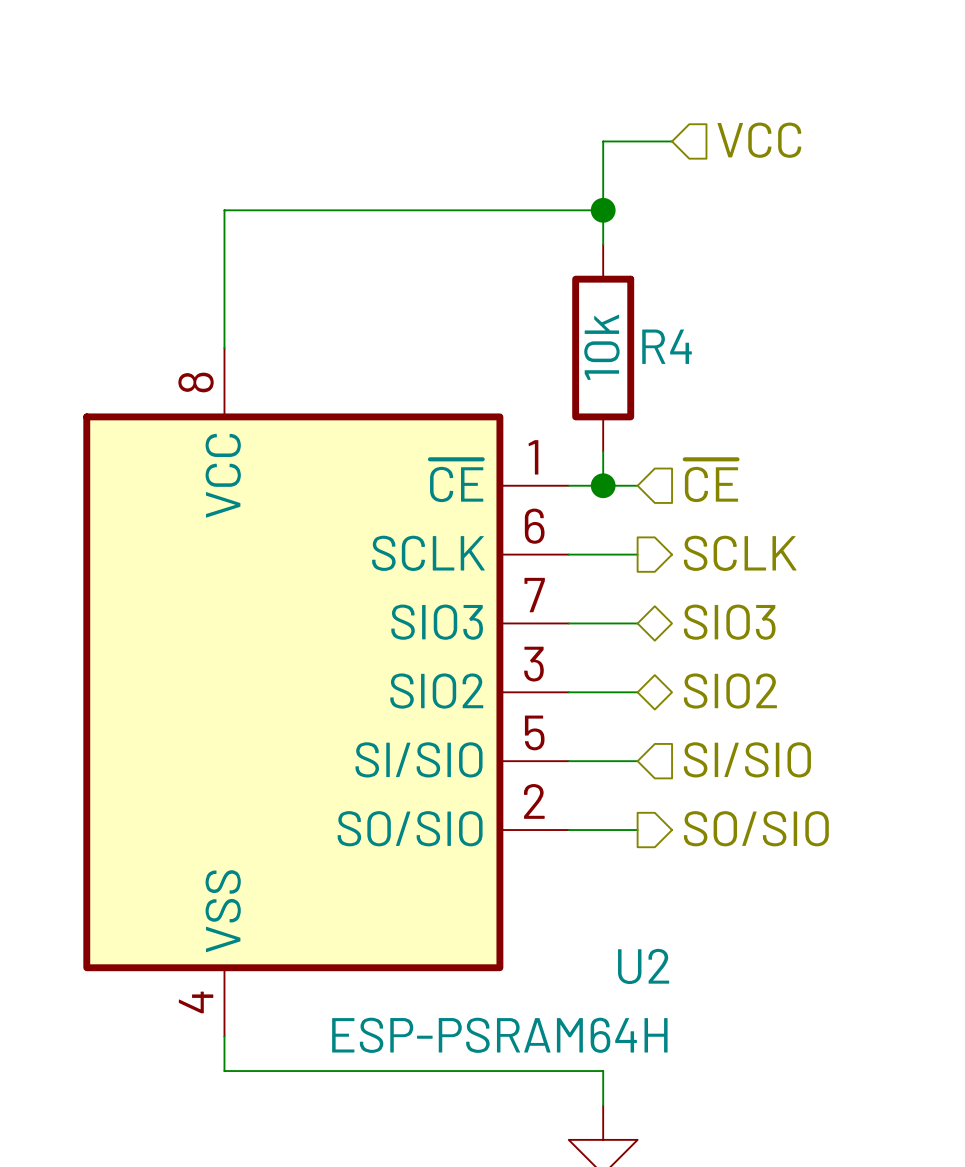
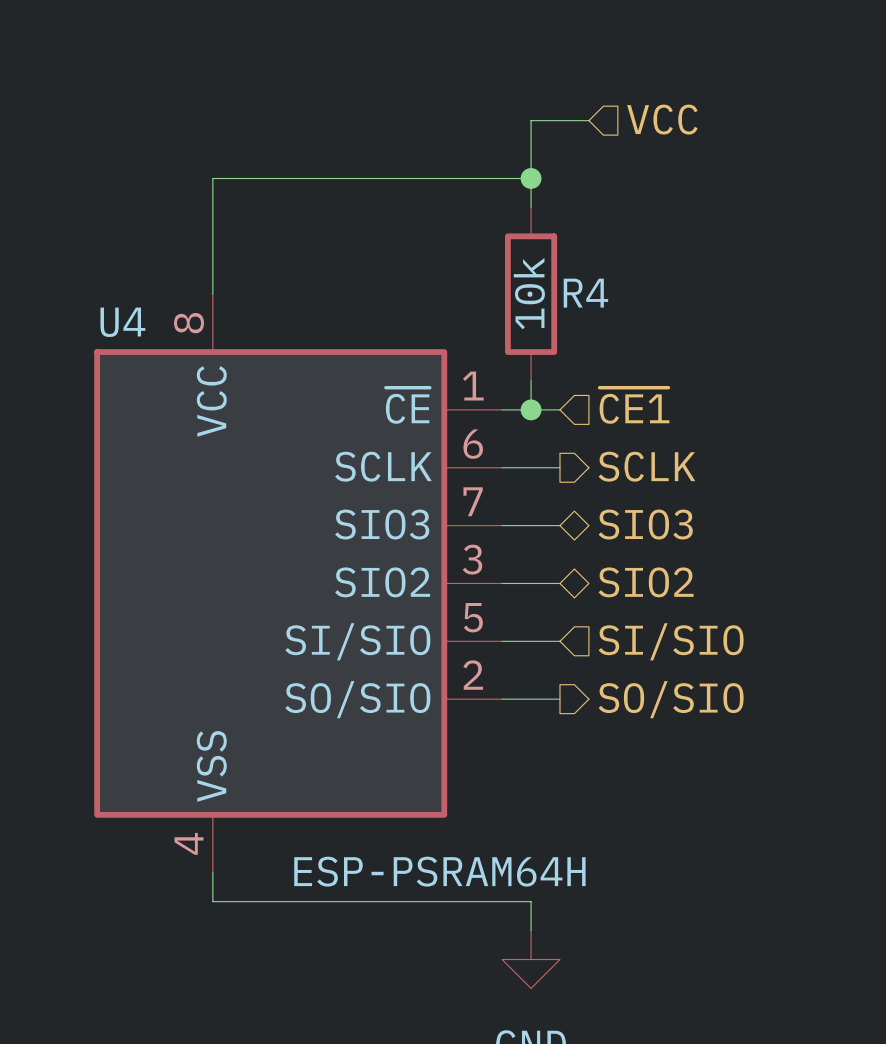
hierarchical label: ~{CE} (711, 480) -> ~{CE1} (634, 405)
U2 name: U2 (643, 966) -> U4 (122, 322)

